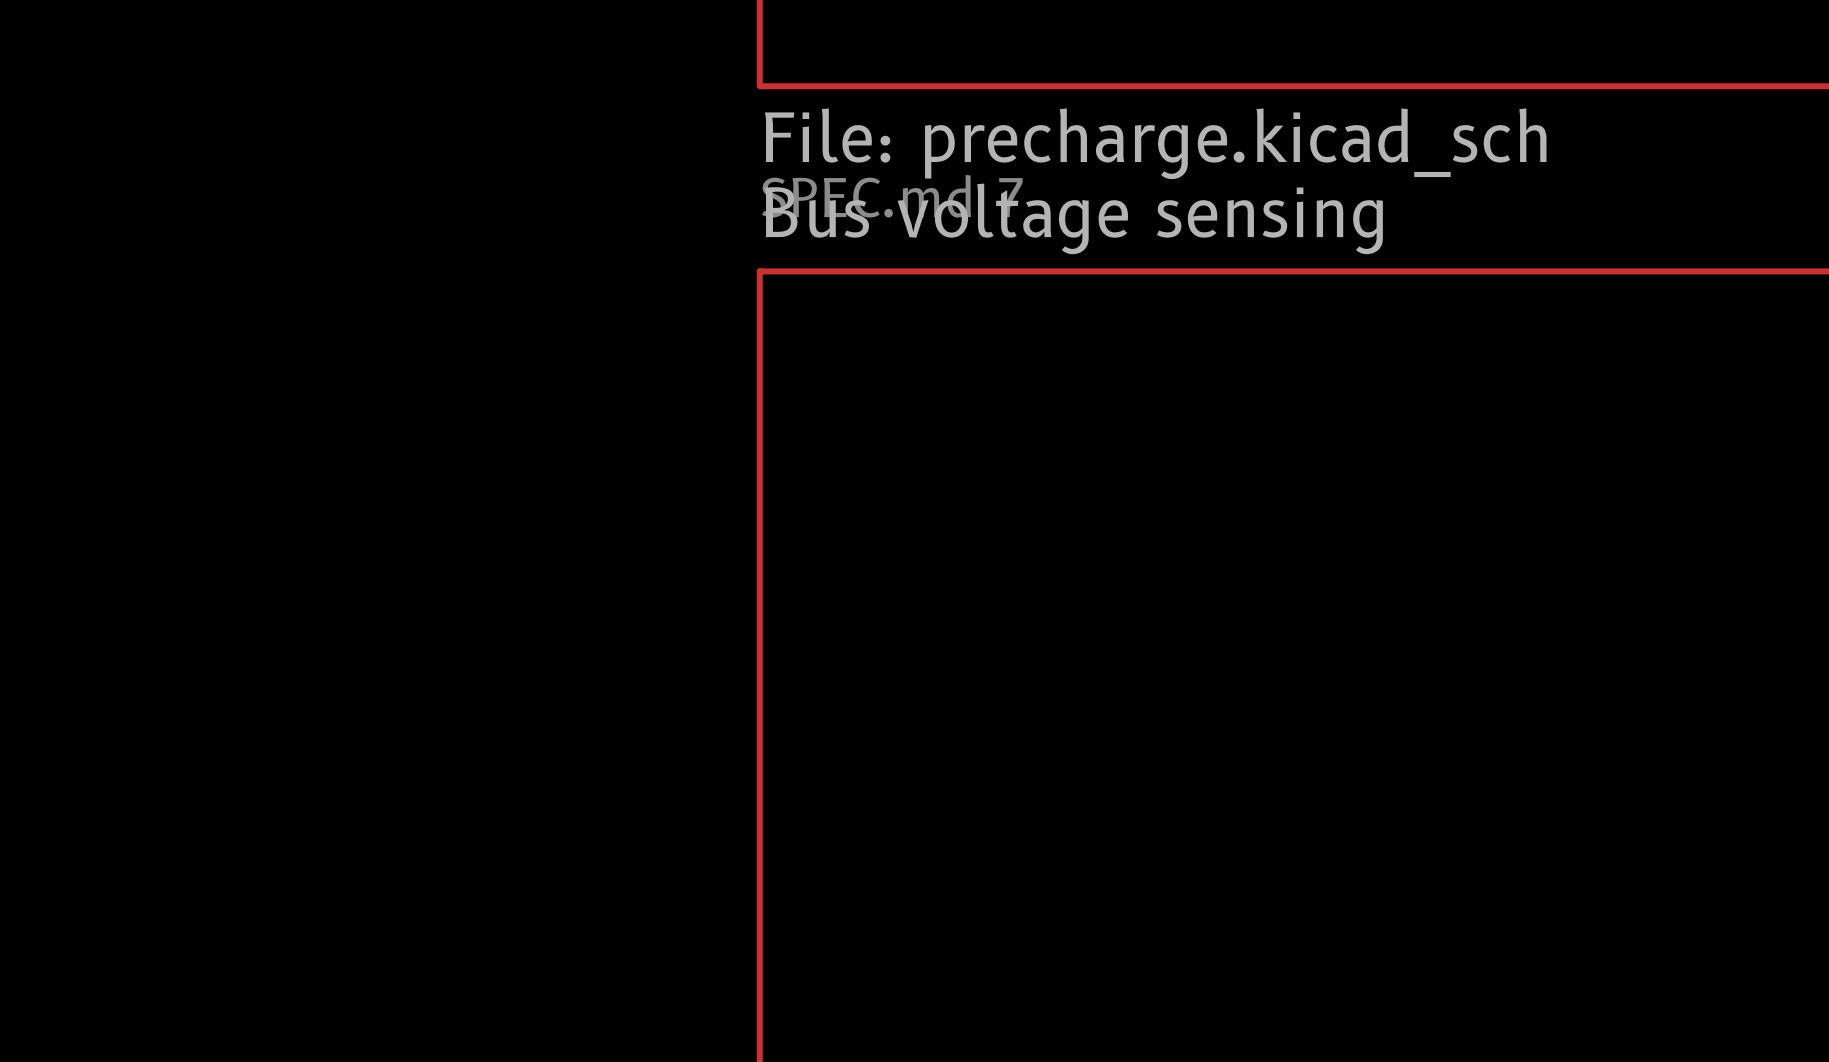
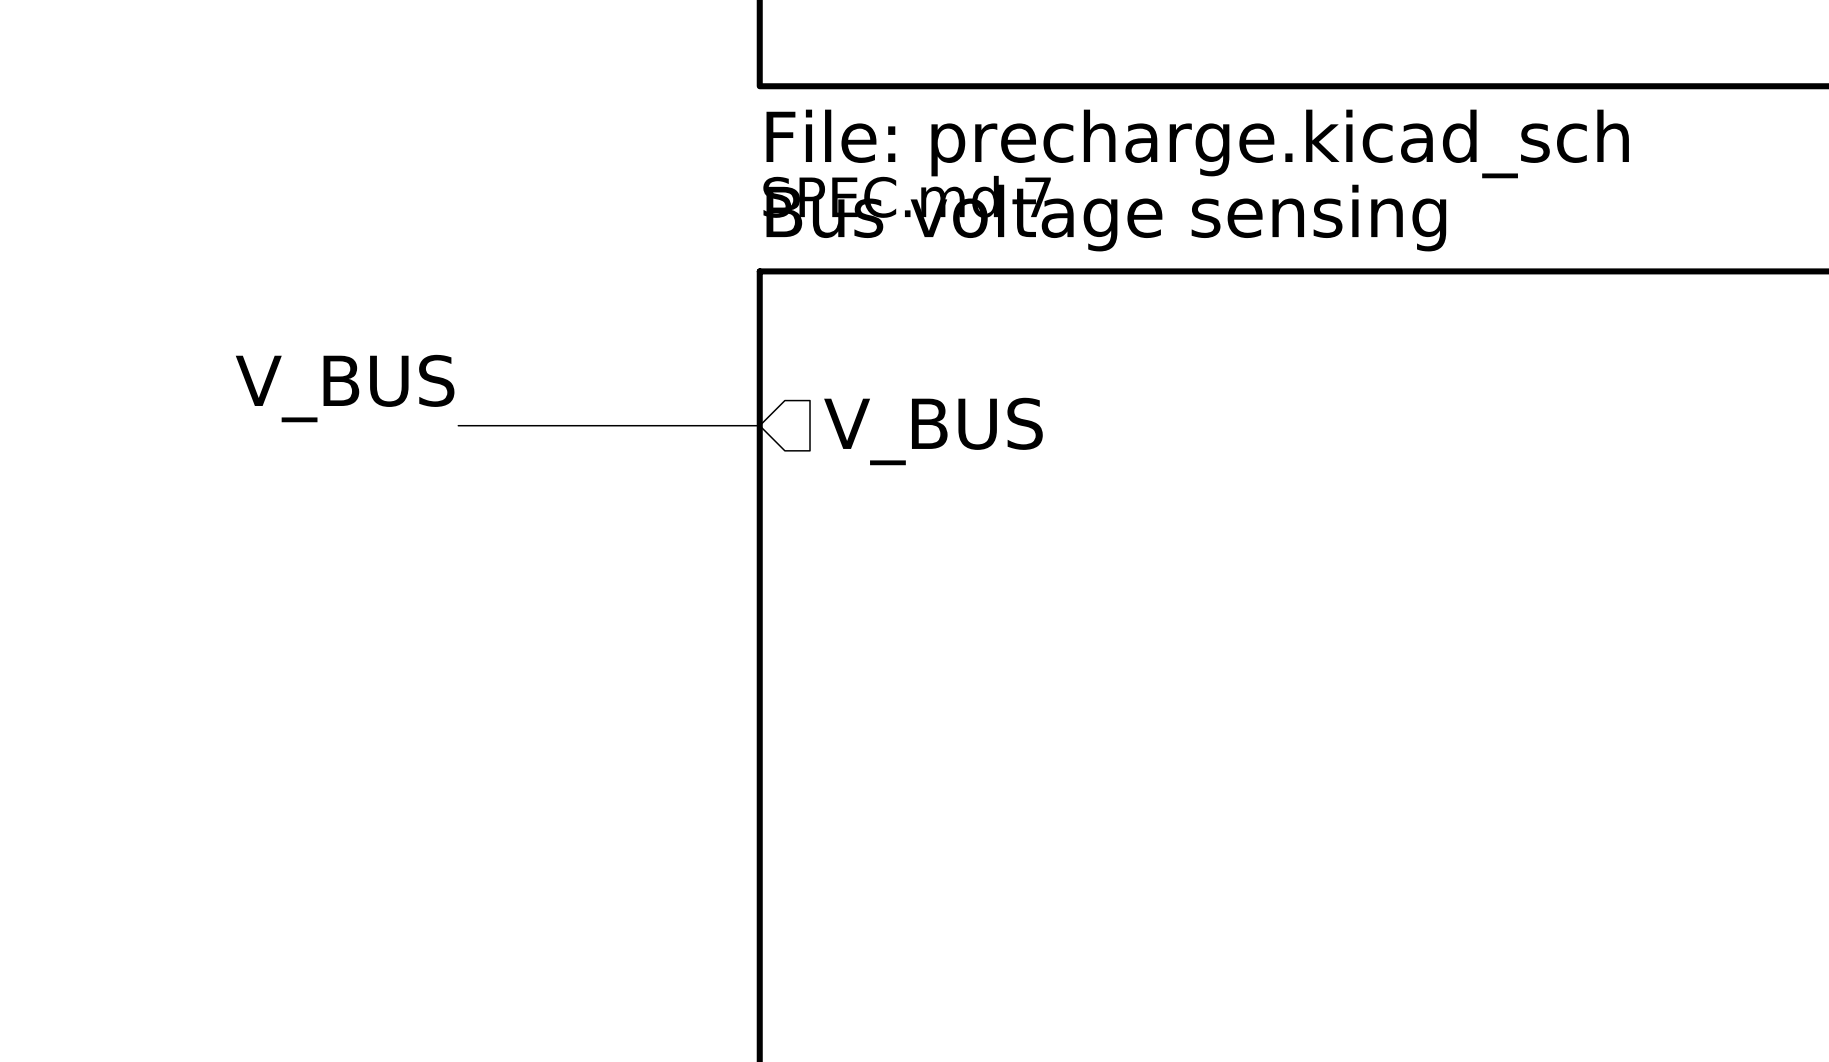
label: none -> V_BUS (345, 388)
wire: none -> (458, 425) (759, 425)
sheet pin: none -> V_BUS (933, 431)

